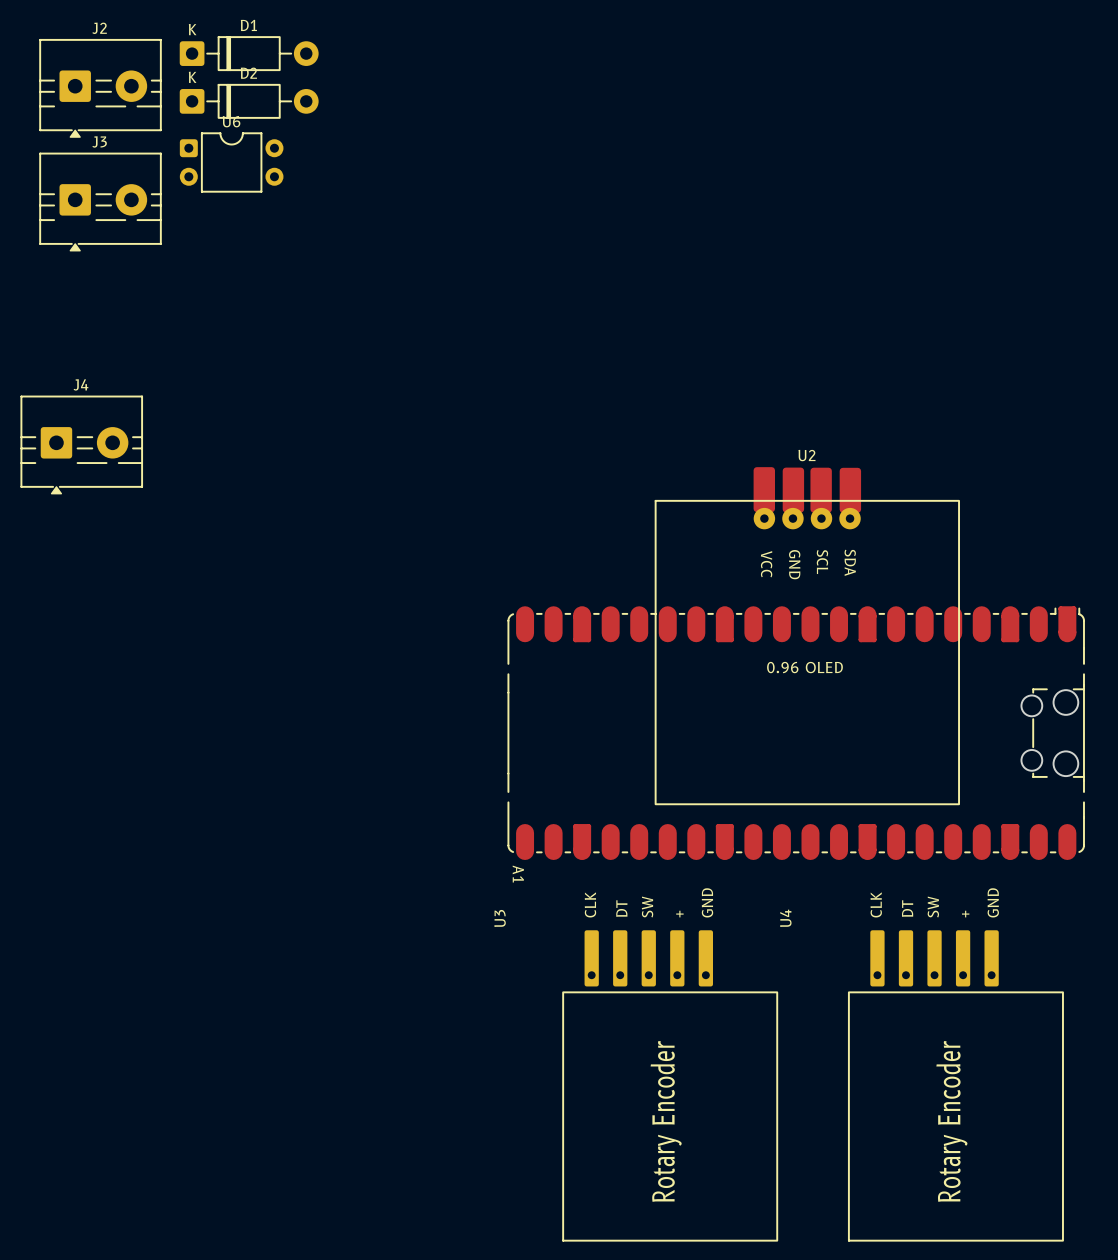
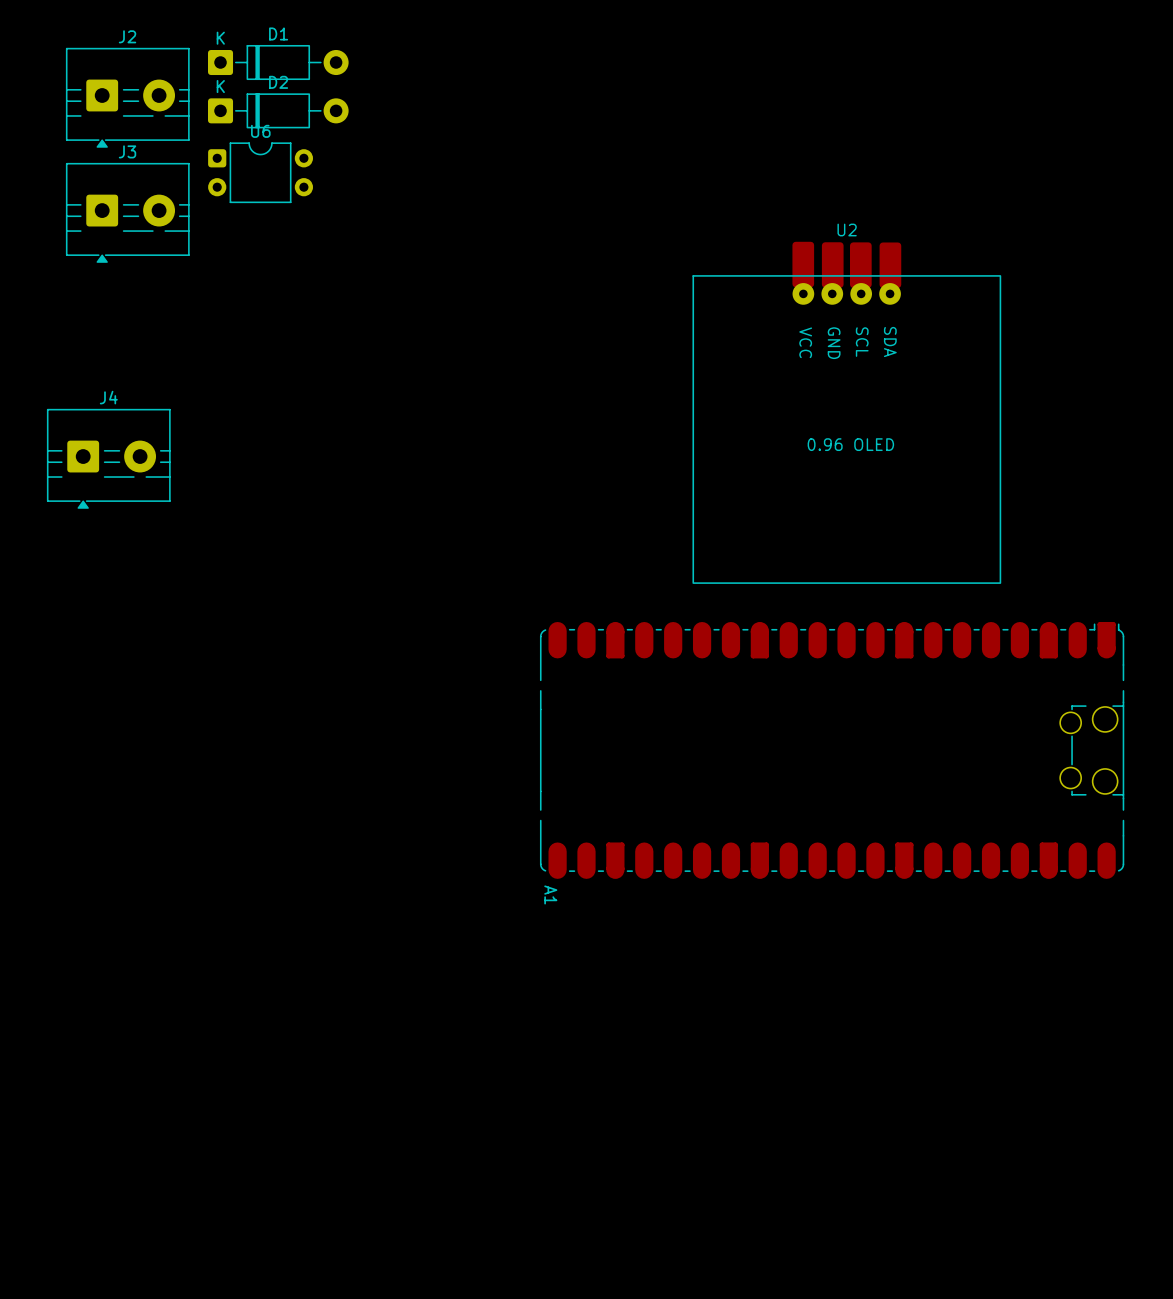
U2 position: (807, 635) -> (846, 412)
U3: (670, 1085) -> none
U4: (955, 1085) -> none

